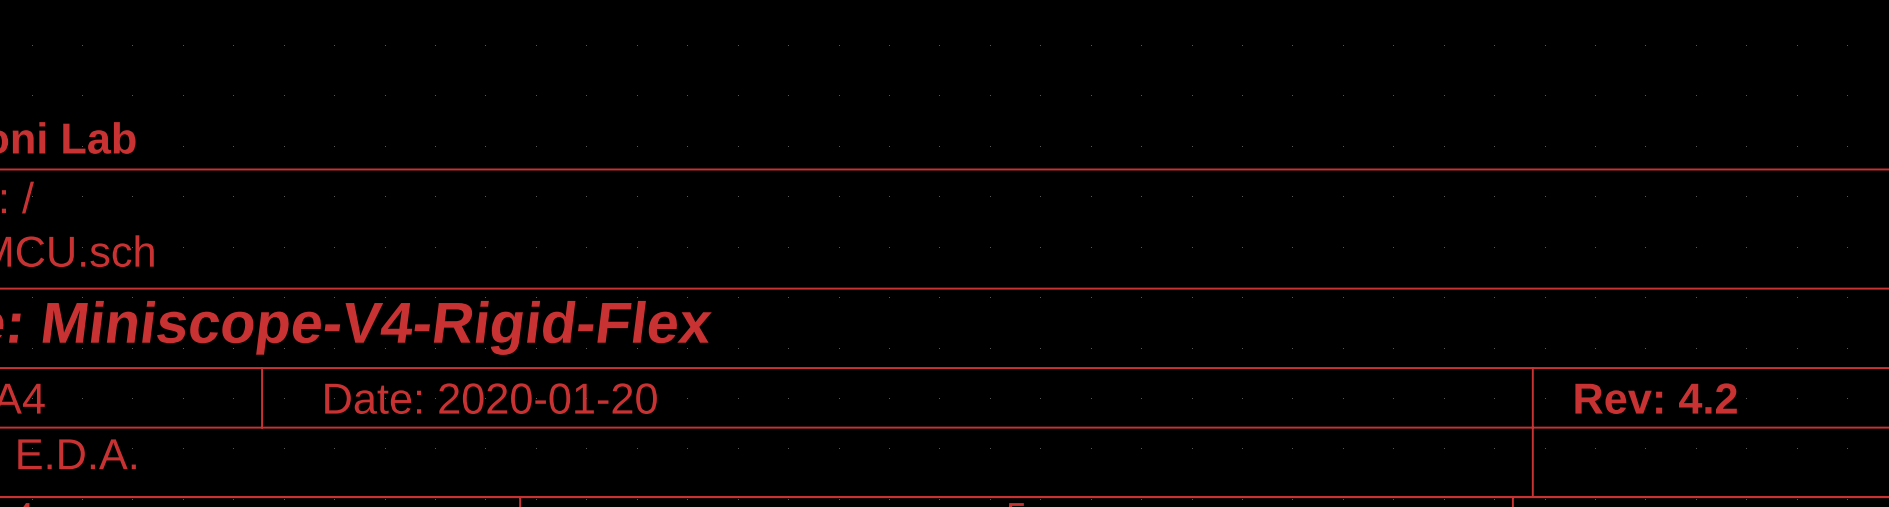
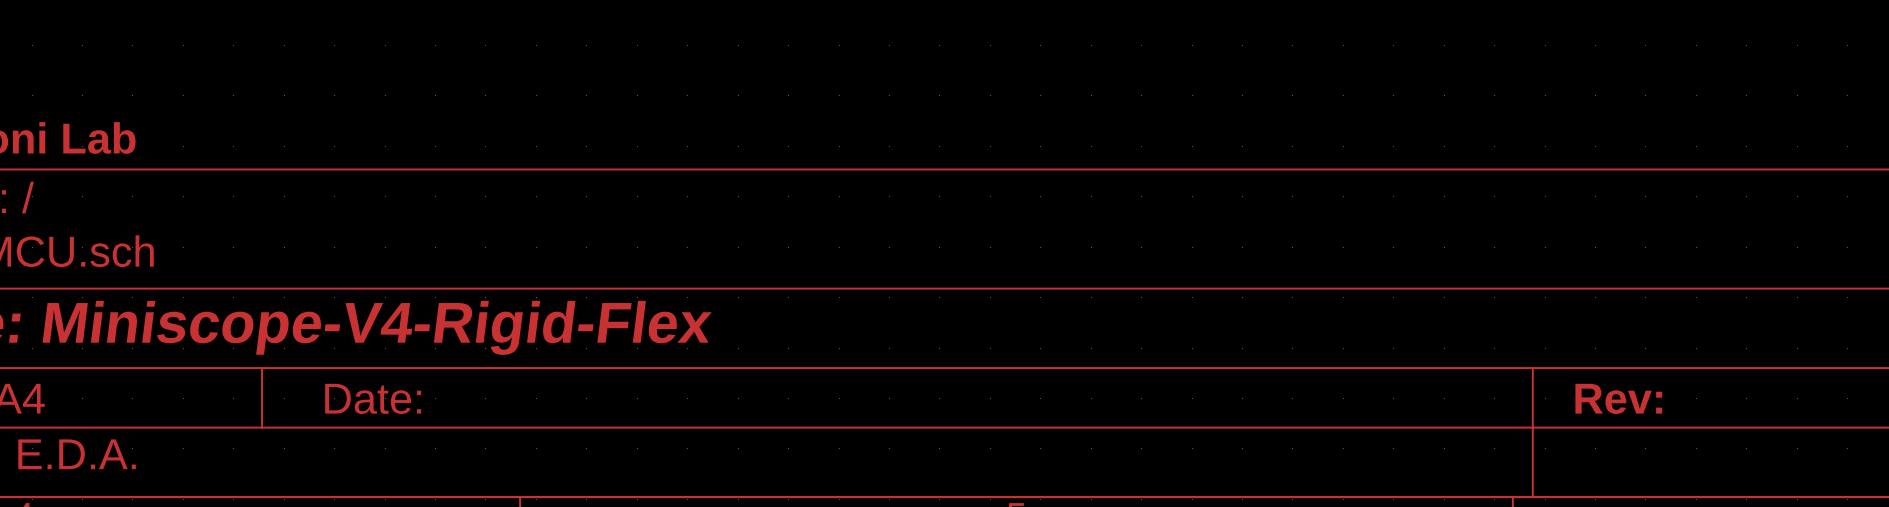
title block: Date: 2020-01-20 (491, 398) -> Date: (373, 398)
title block: Rev: 4.2 (1656, 398) -> Rev: (1618, 398)

